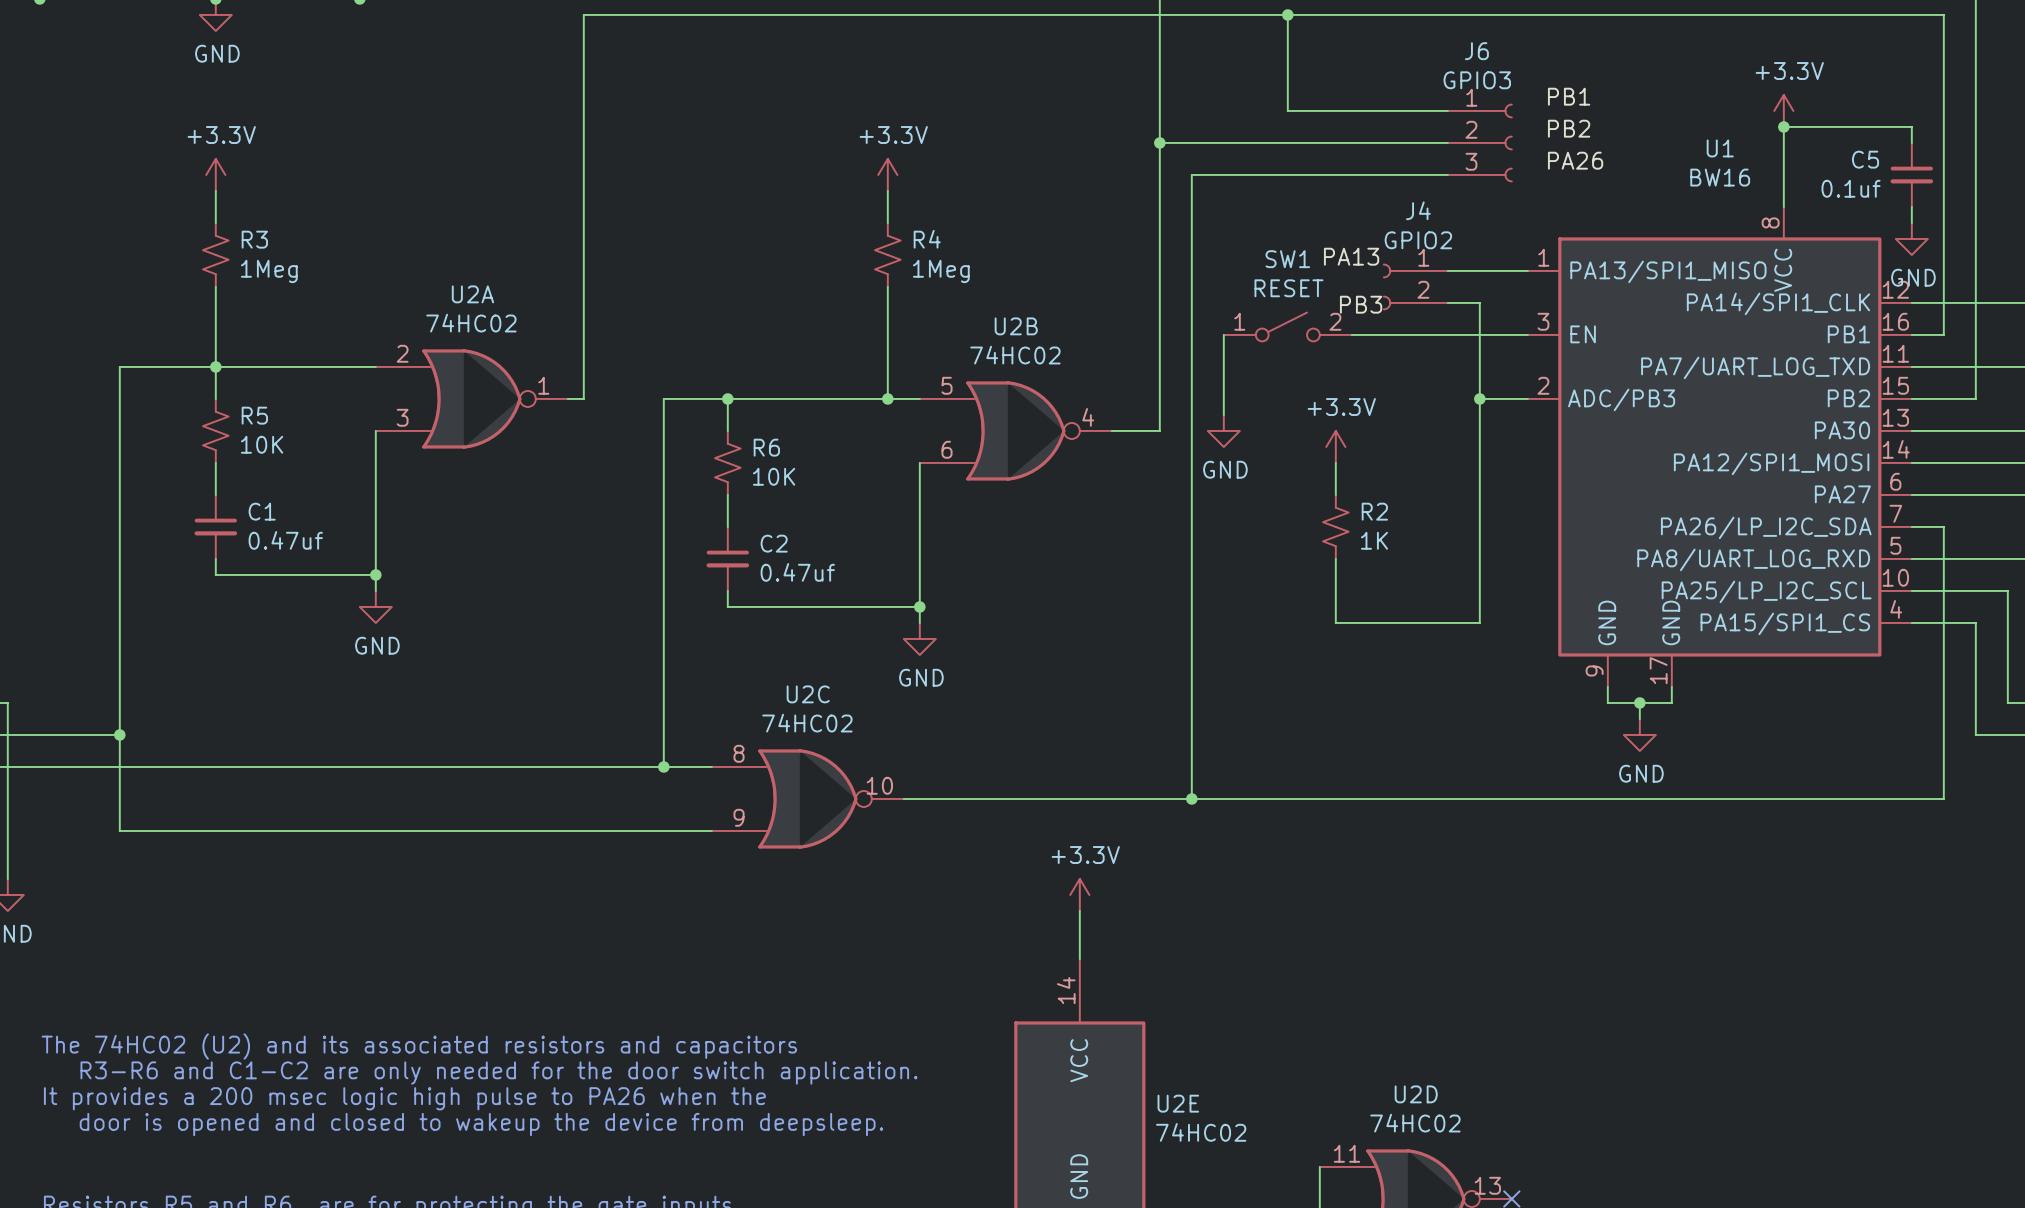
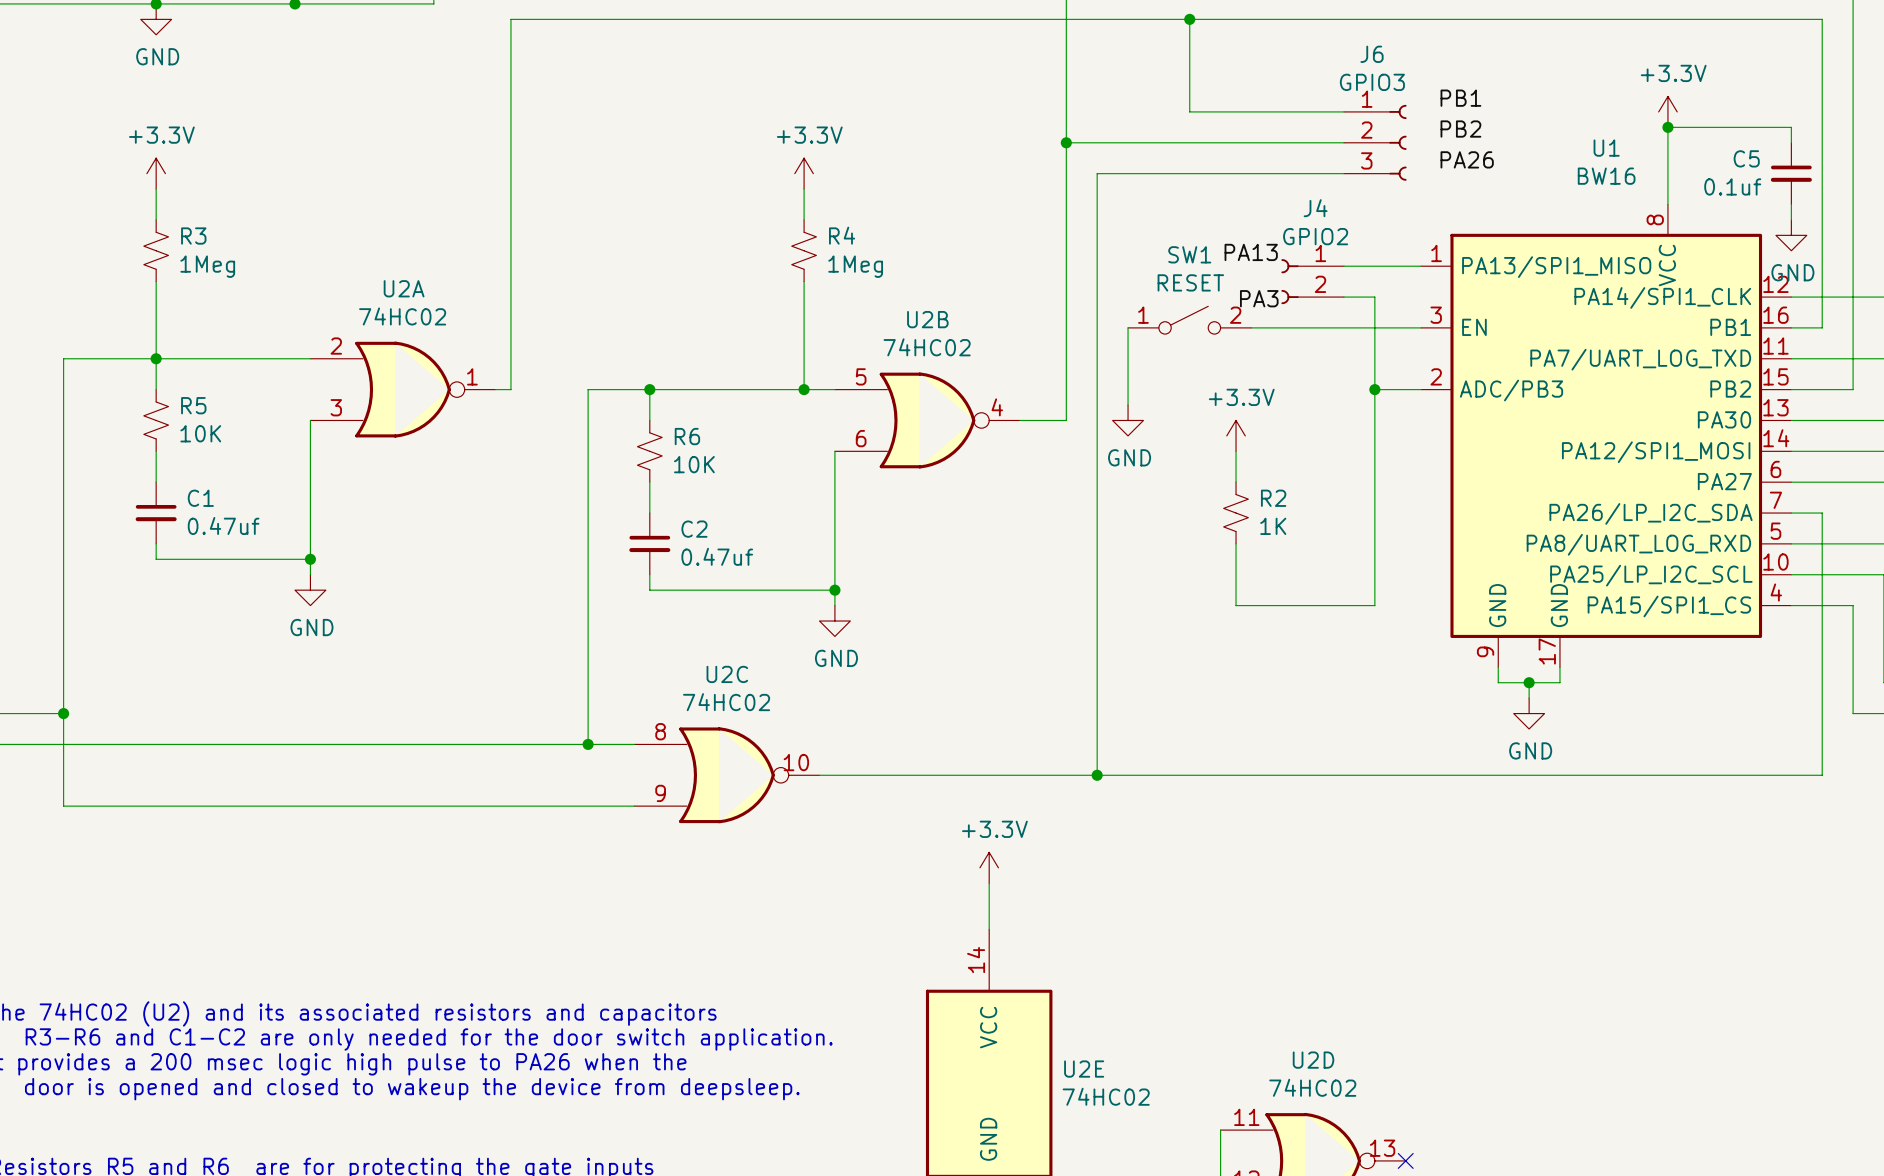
label: PB3 (1361, 304) -> PA3 (1259, 298)

